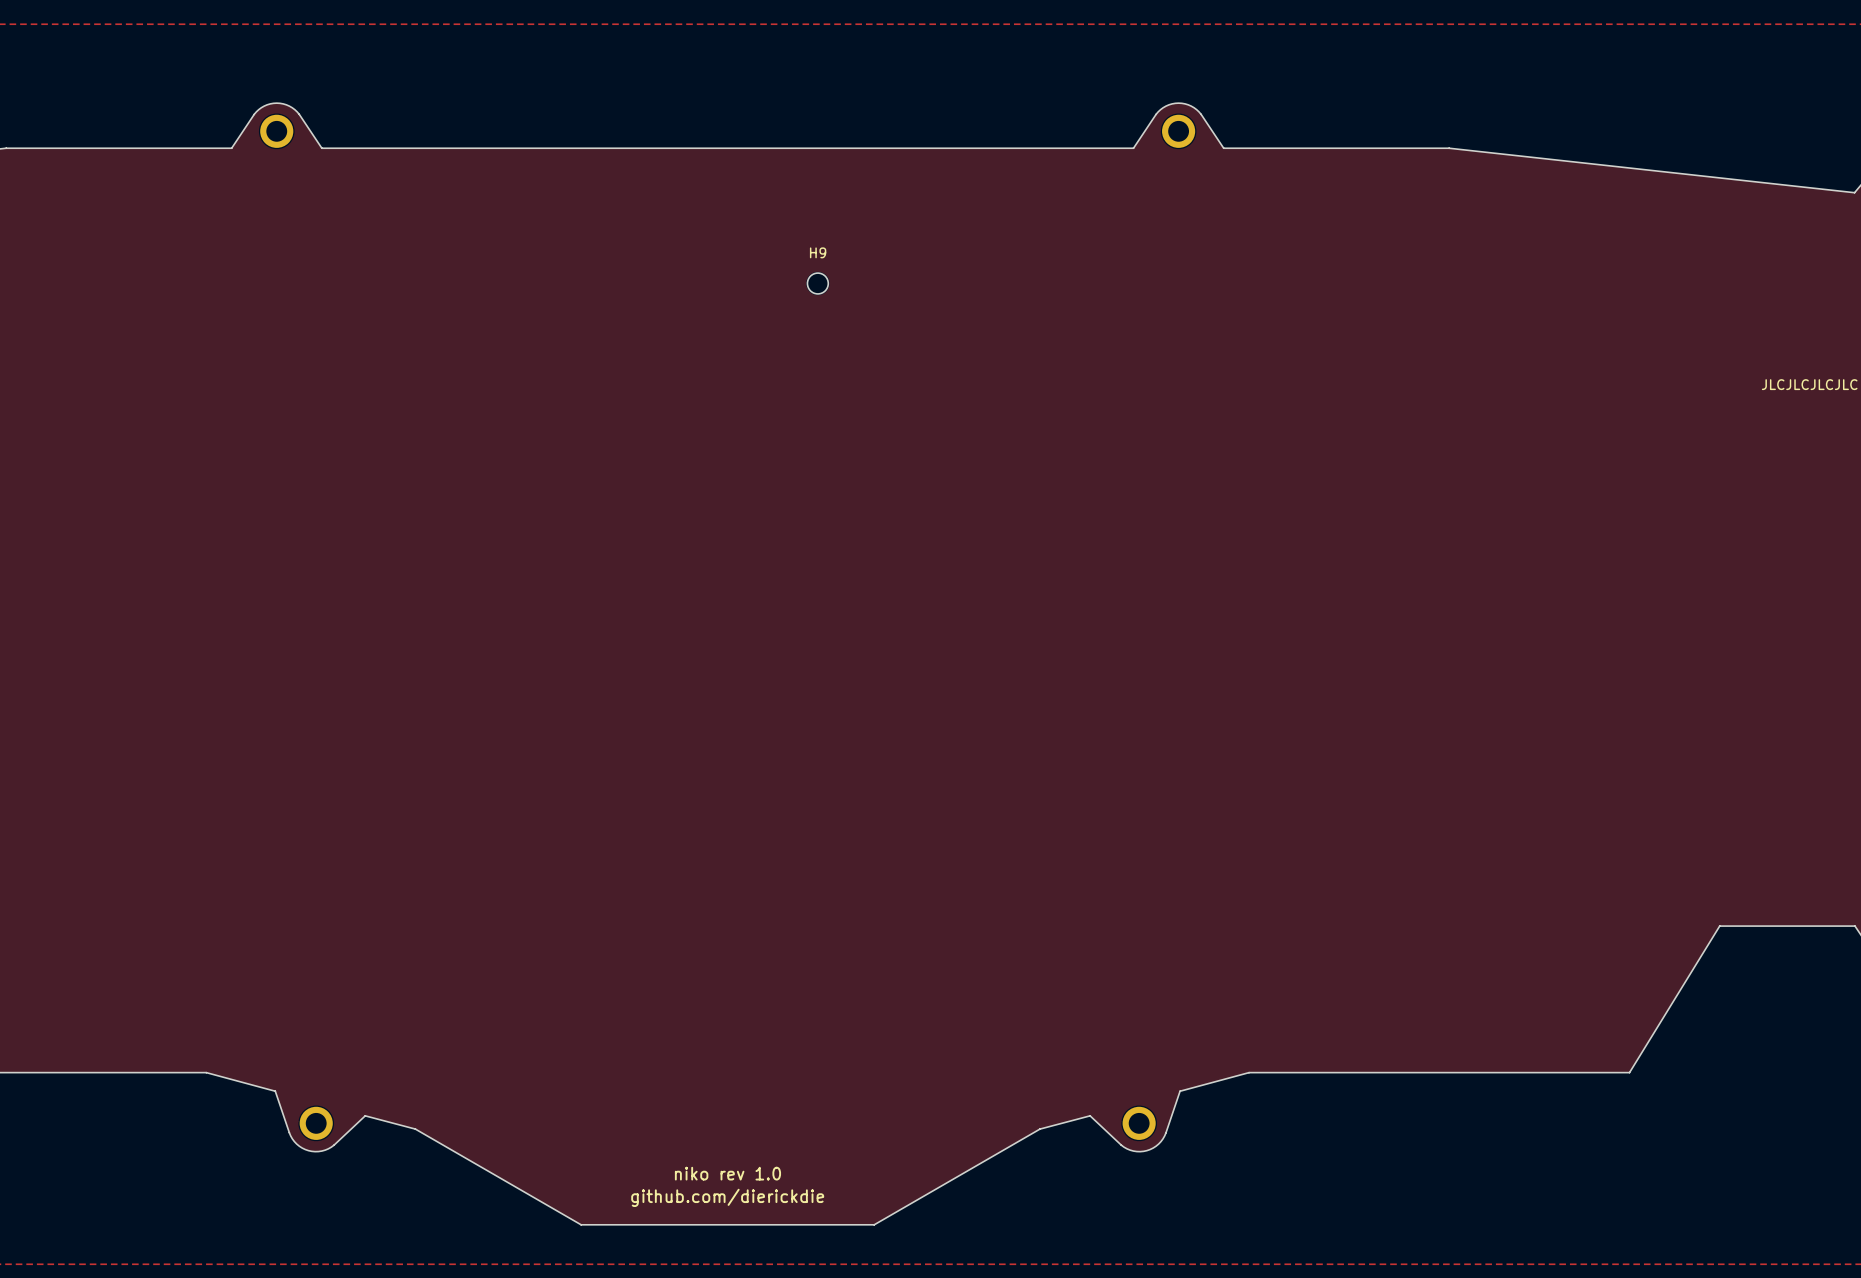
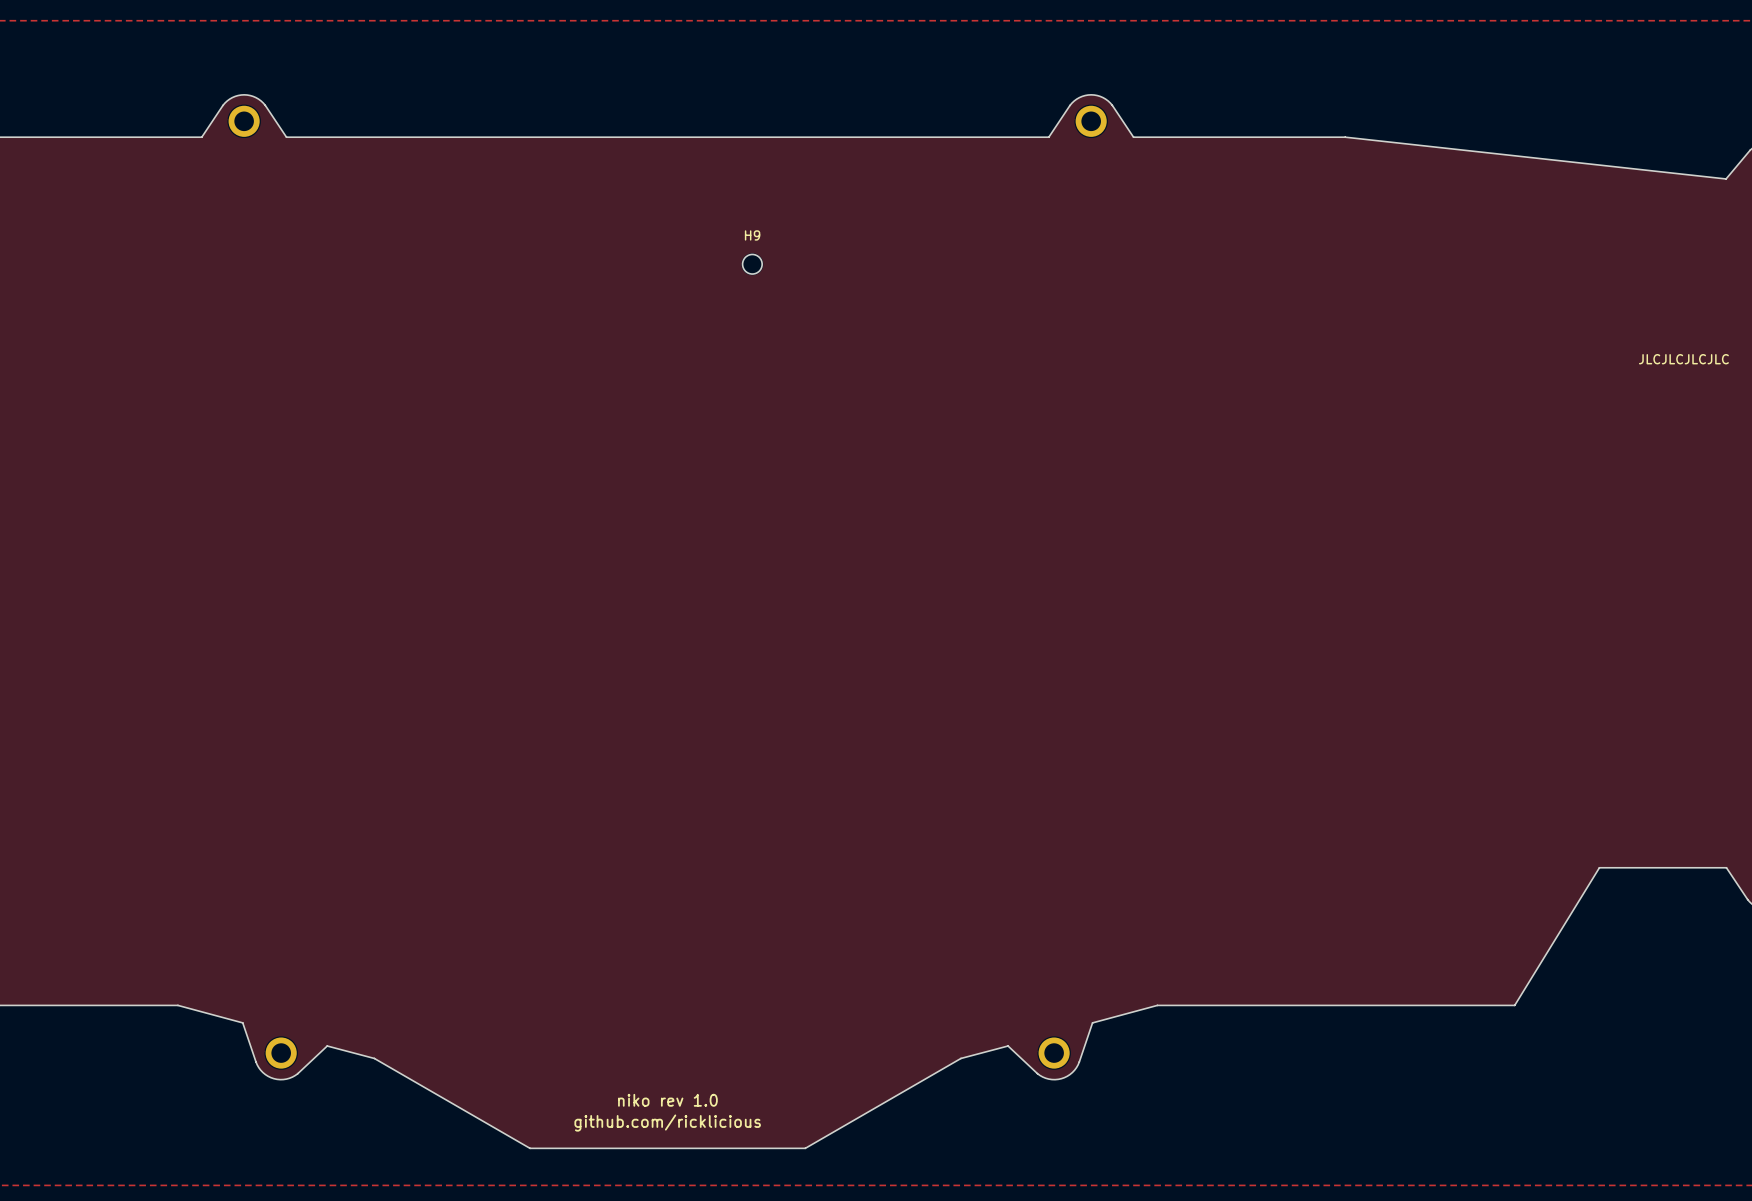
text: github.com/dierickdie (727, 1197) -> github.com/ricklicious (667, 1123)

